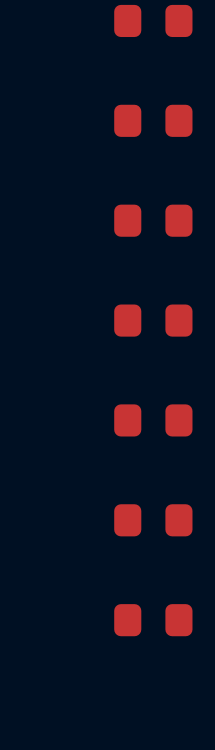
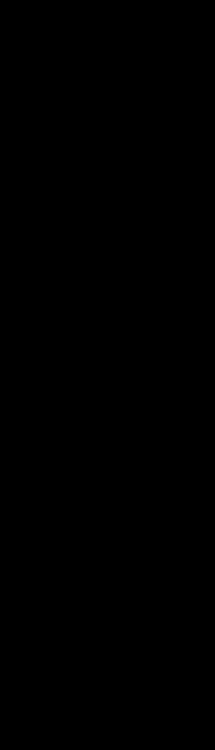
part: (153, 20) -> none
part: (153, 120) -> none
part: (153, 220) -> none
part: (153, 320) -> none
part: (153, 420) -> none
part: (153, 520) -> none
part: (153, 620) -> none

